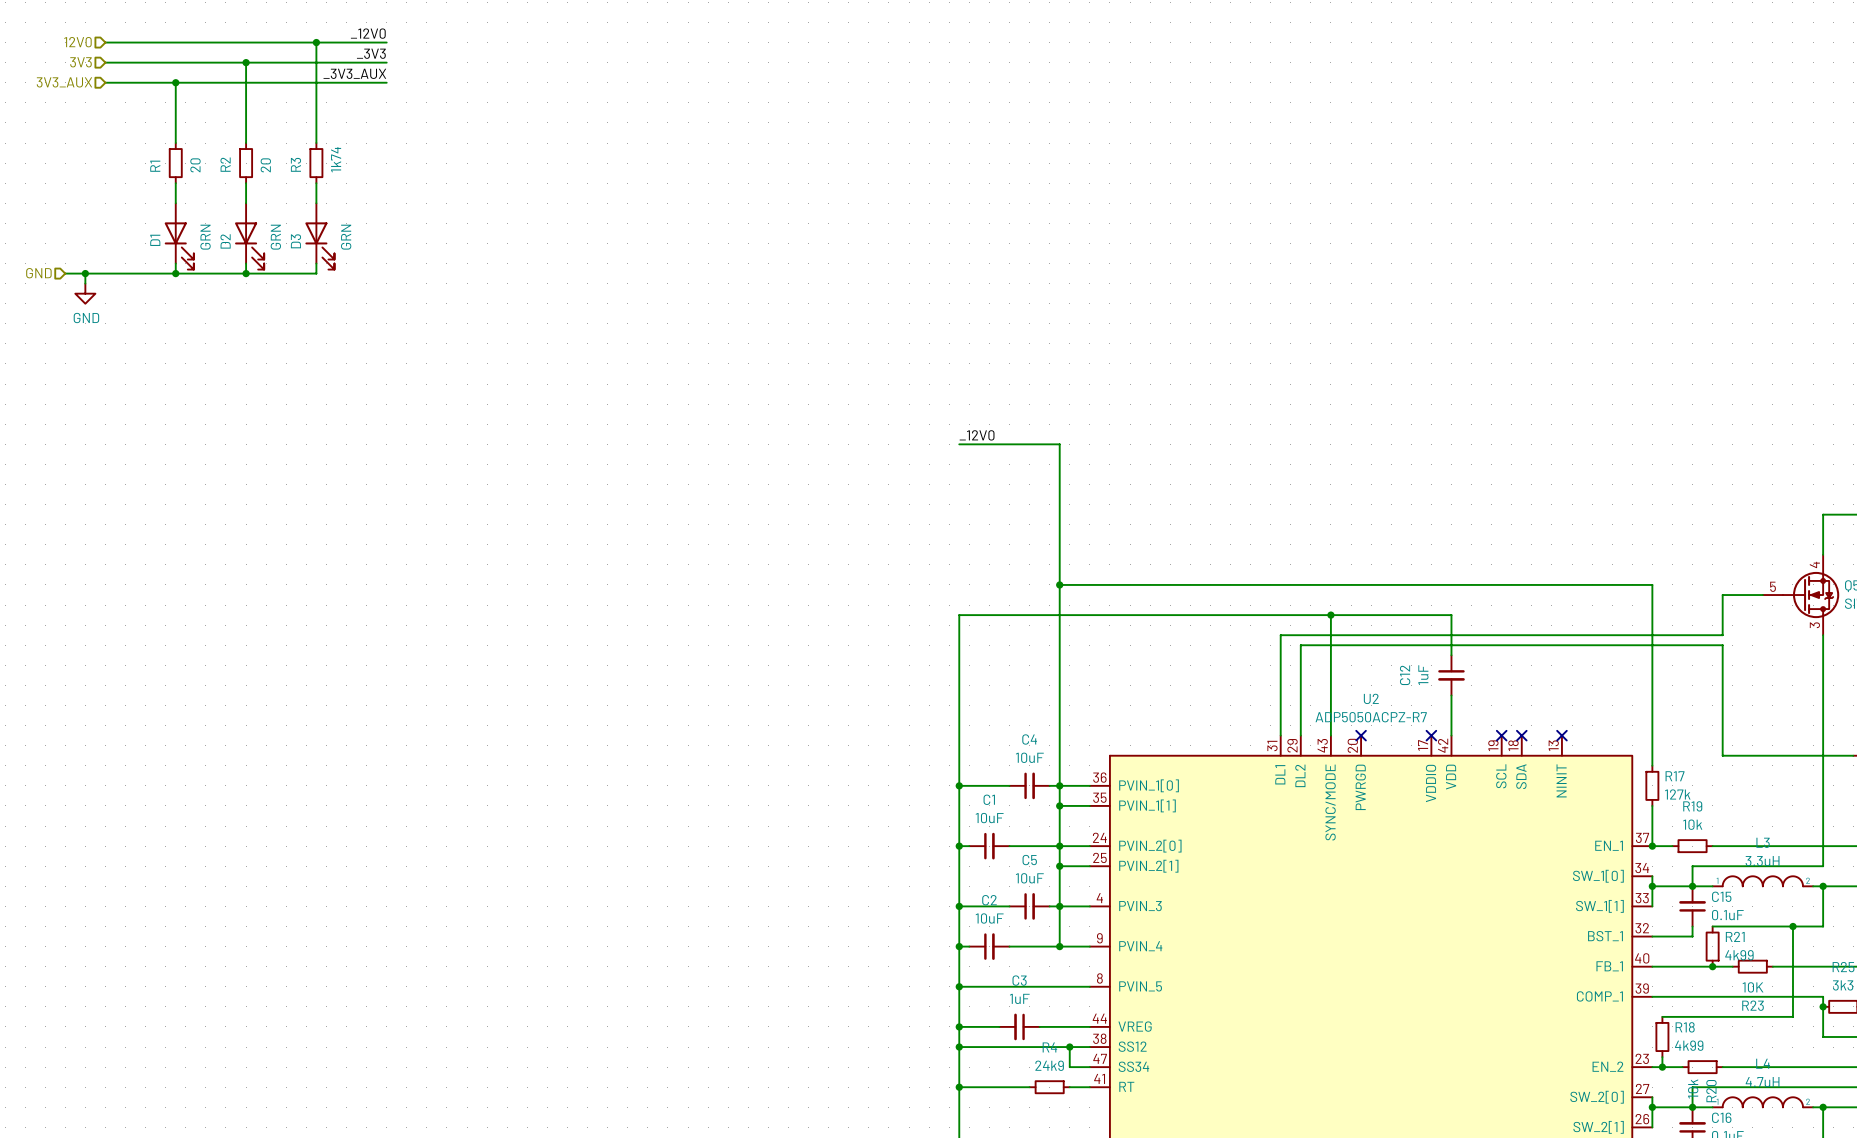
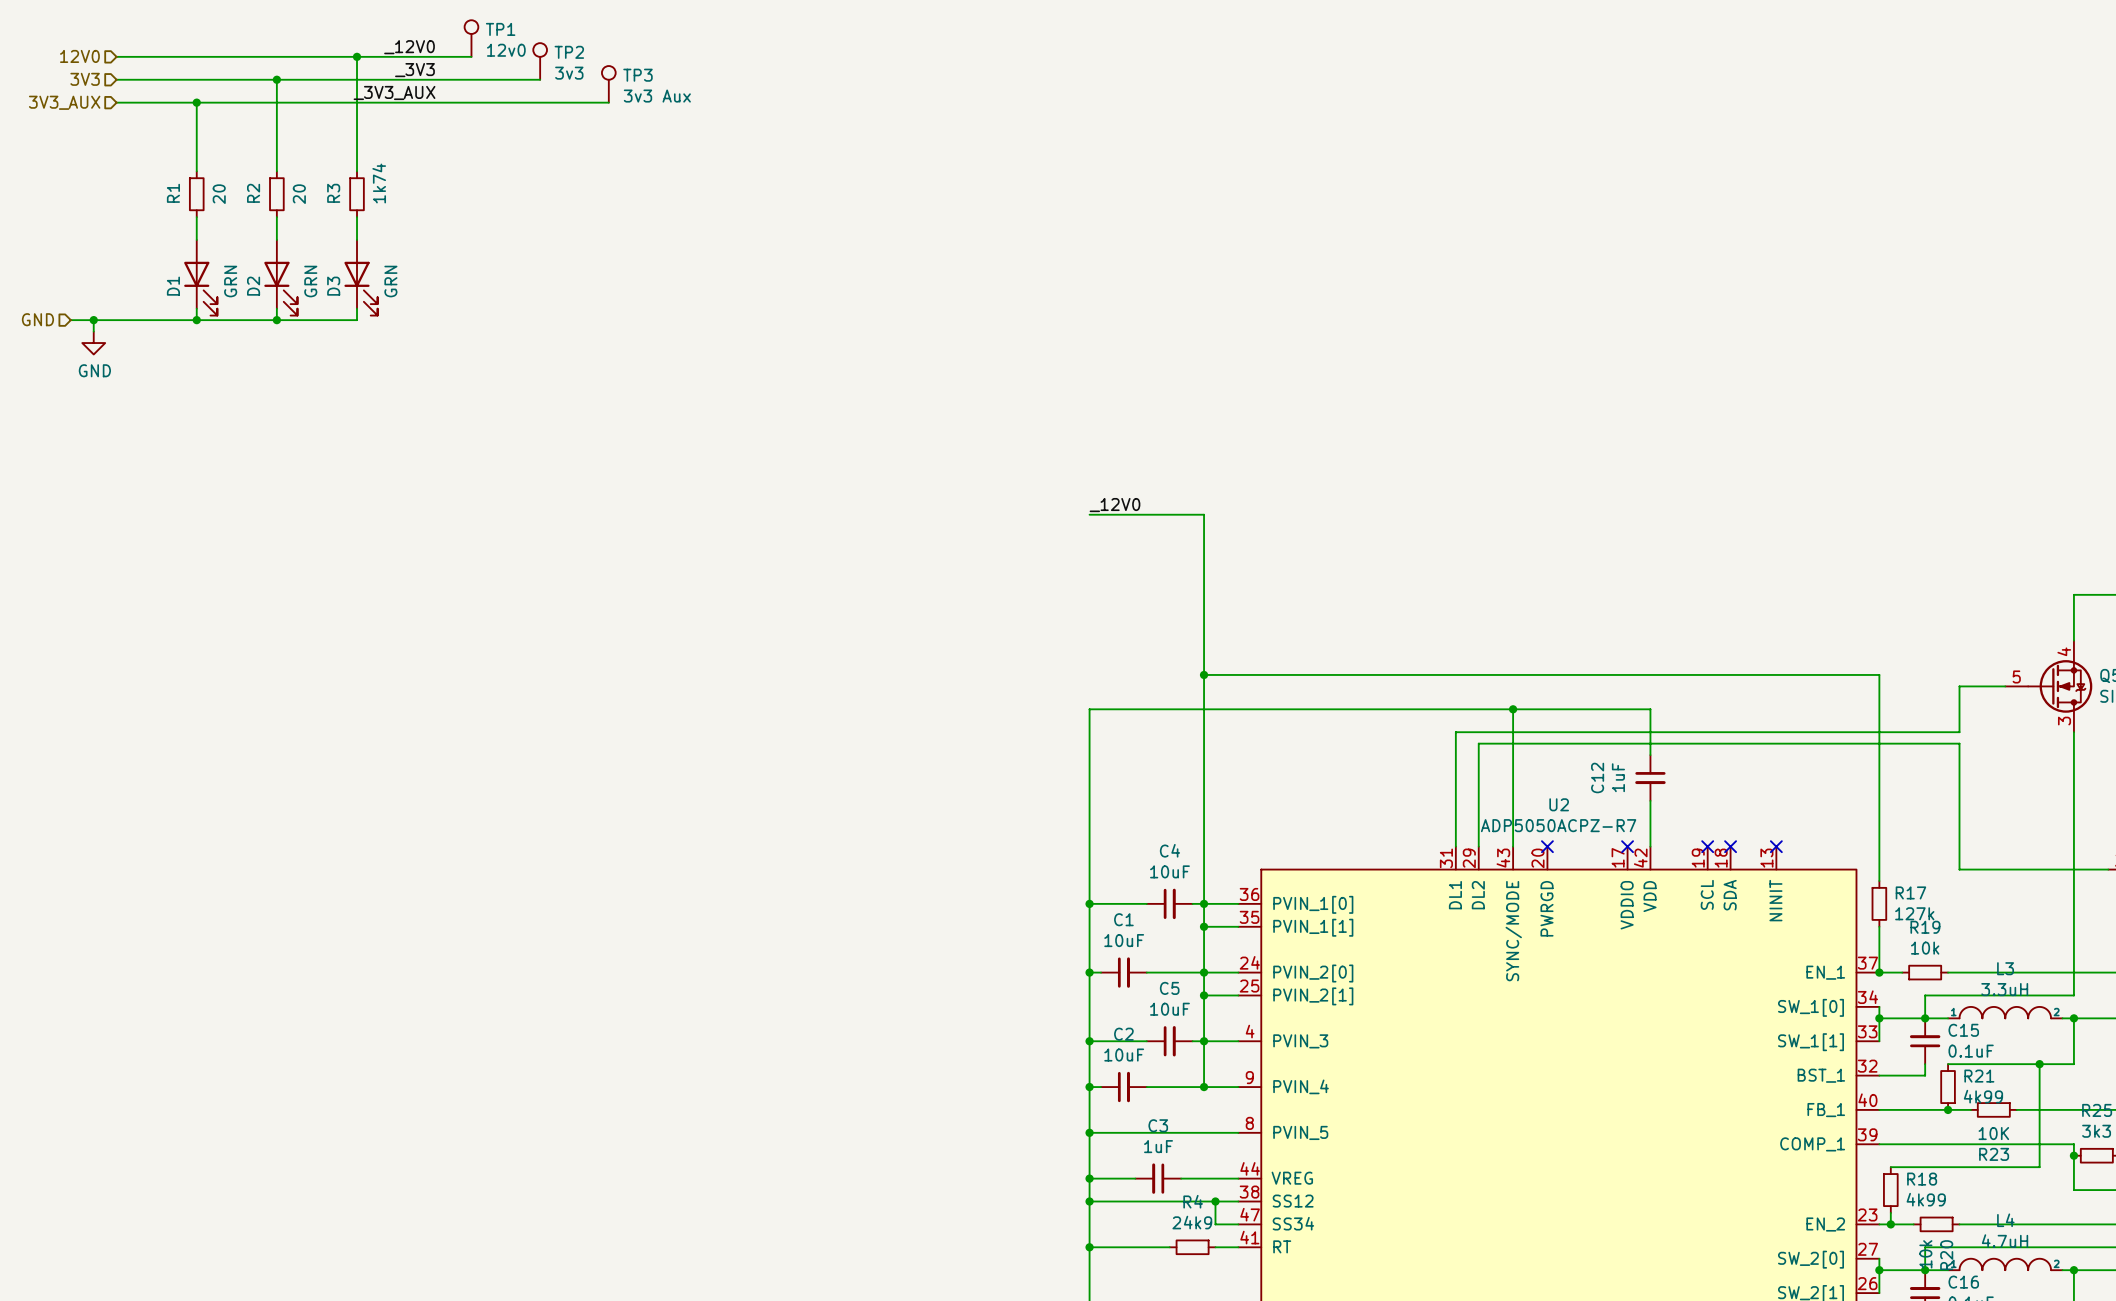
TP1: none -> 12v0 (471, 38)
wire: none -> (437, 56) (471, 56)
TP2: none -> 3v3 (540, 61)
wire: none -> (437, 79) (540, 79)
TP3: none -> 3v3 Aux (608, 84)
wire: none -> (437, 102) (608, 102)

